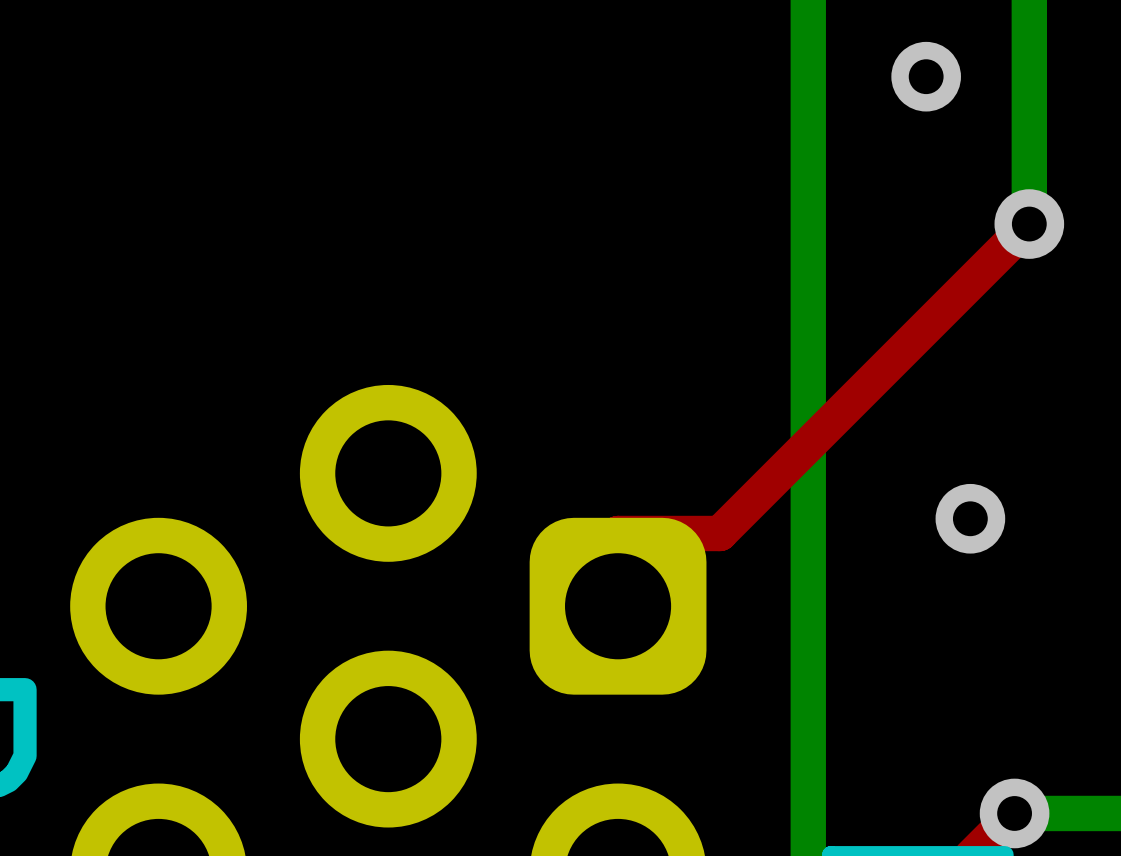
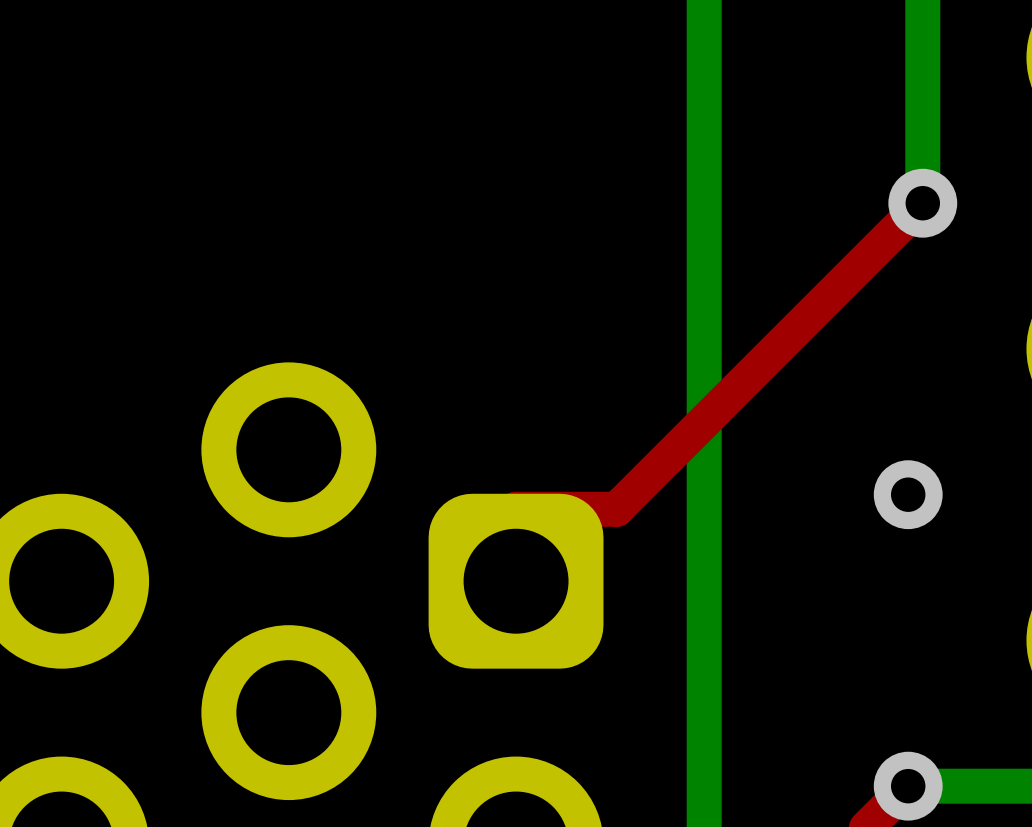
via: (926, 76) -> none
via position: (970, 518) -> (908, 494)

